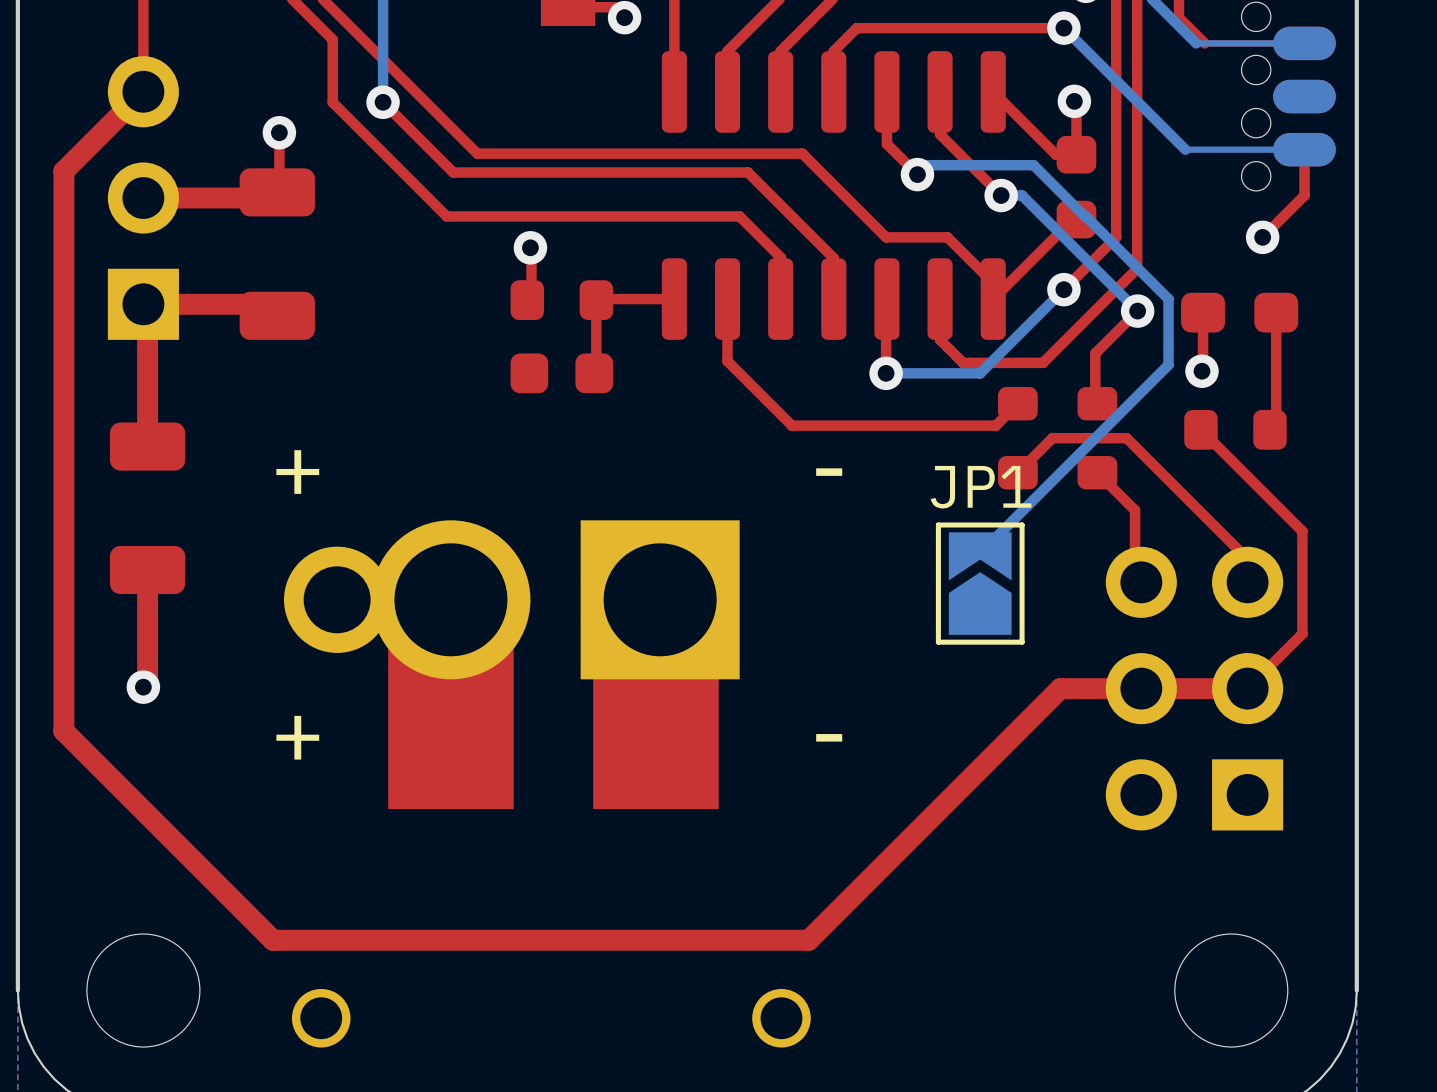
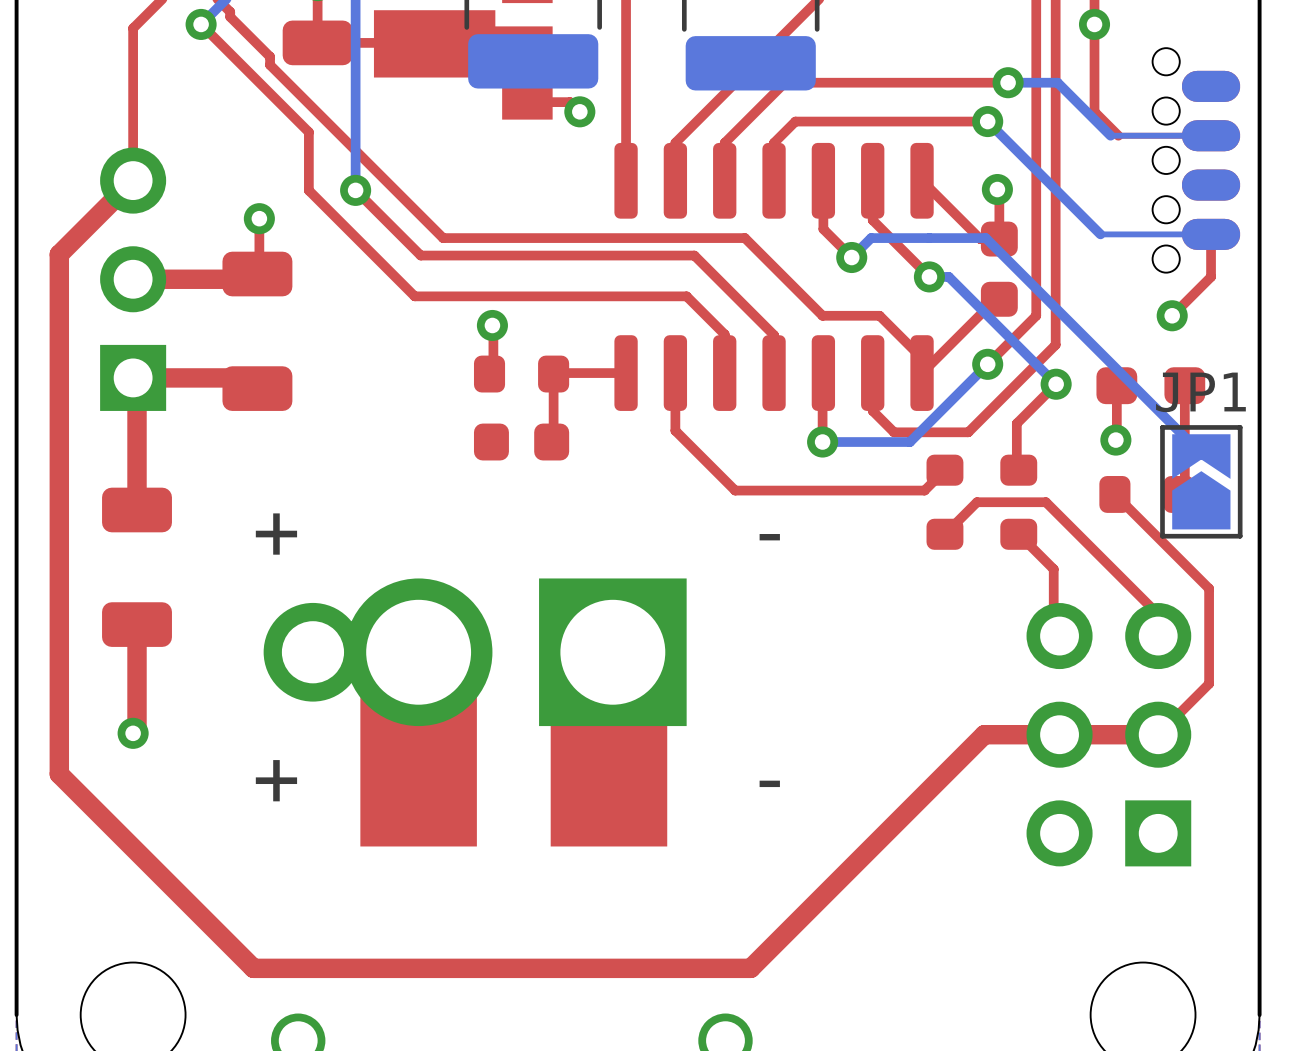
bottom track: (926, 165) (1033, 165) (1168, 299) (1168, 364) (980, 553) -> (860, 248) (871, 238) (985, 238) (1201, 453)
JP1 position: (980, 583) -> (1201, 481)

